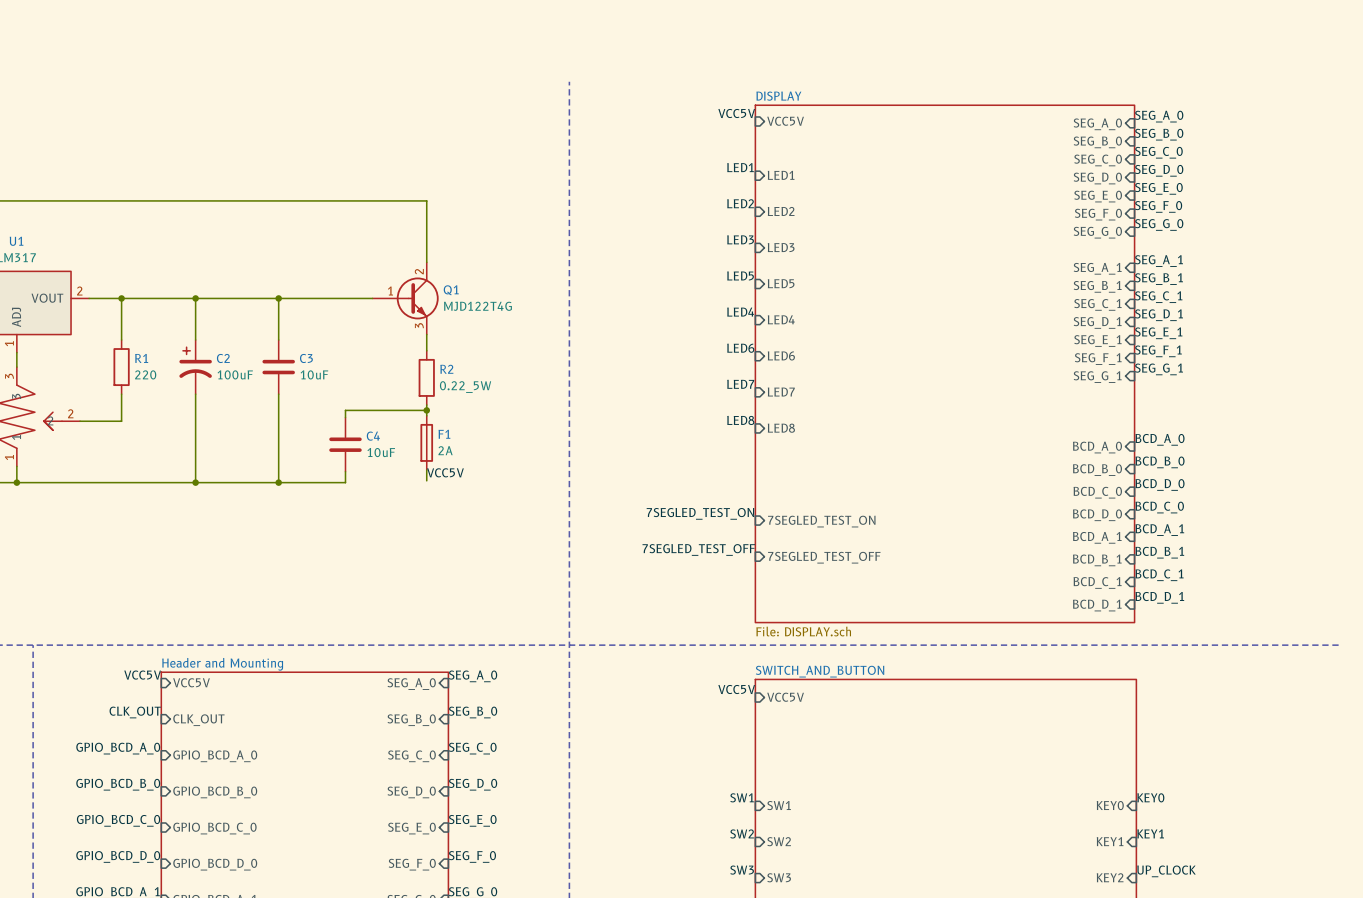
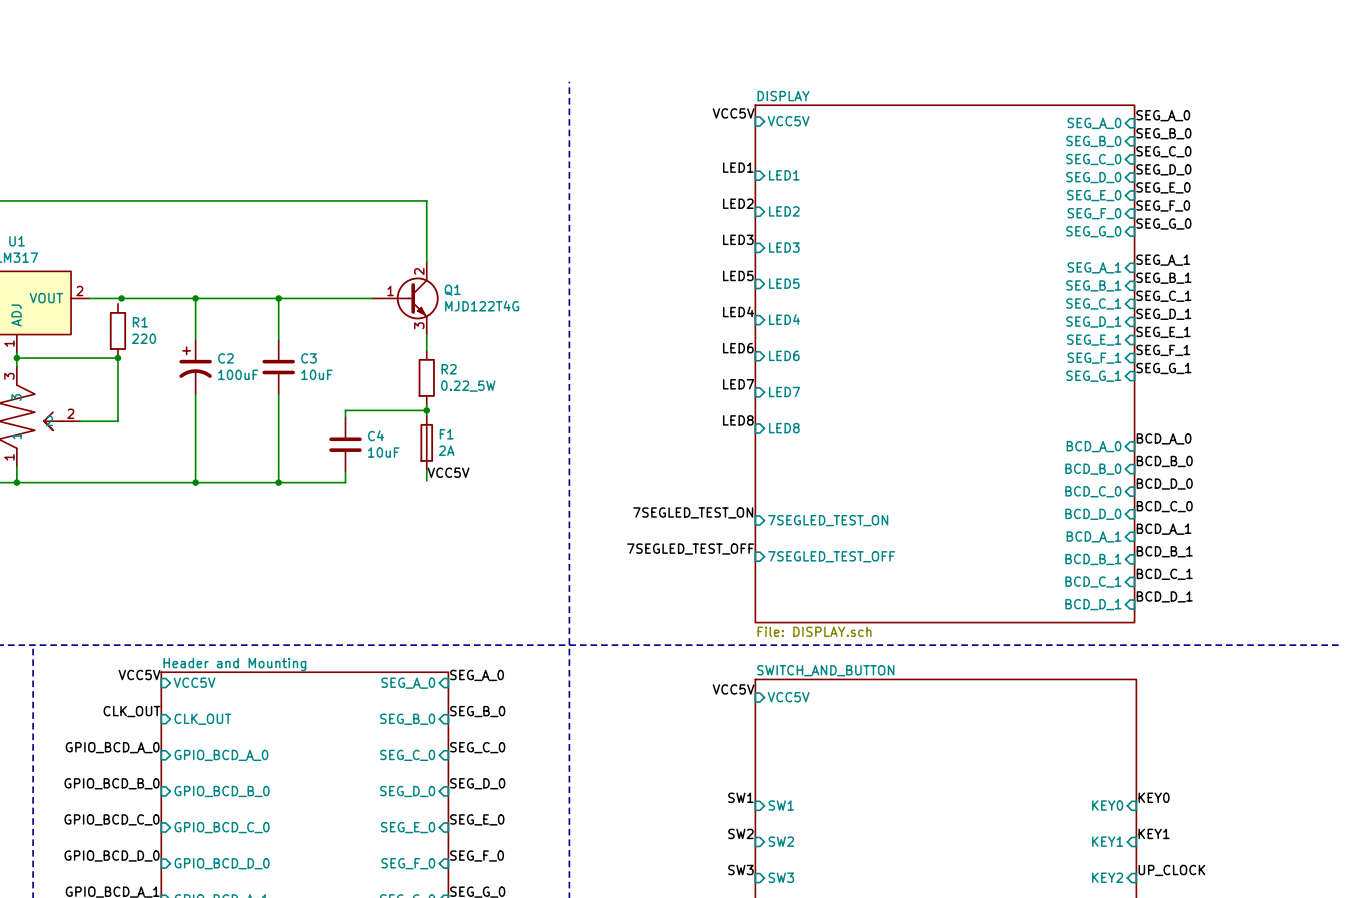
wire: (121, 298) (121, 339) -> none
junction: none -> (16, 358)
junction: none -> (117, 358)
R1 position: (121, 367) -> (117, 330)
wire: (121, 394) (121, 421) (117, 421) -> (16, 358) (117, 358) (117, 421)

